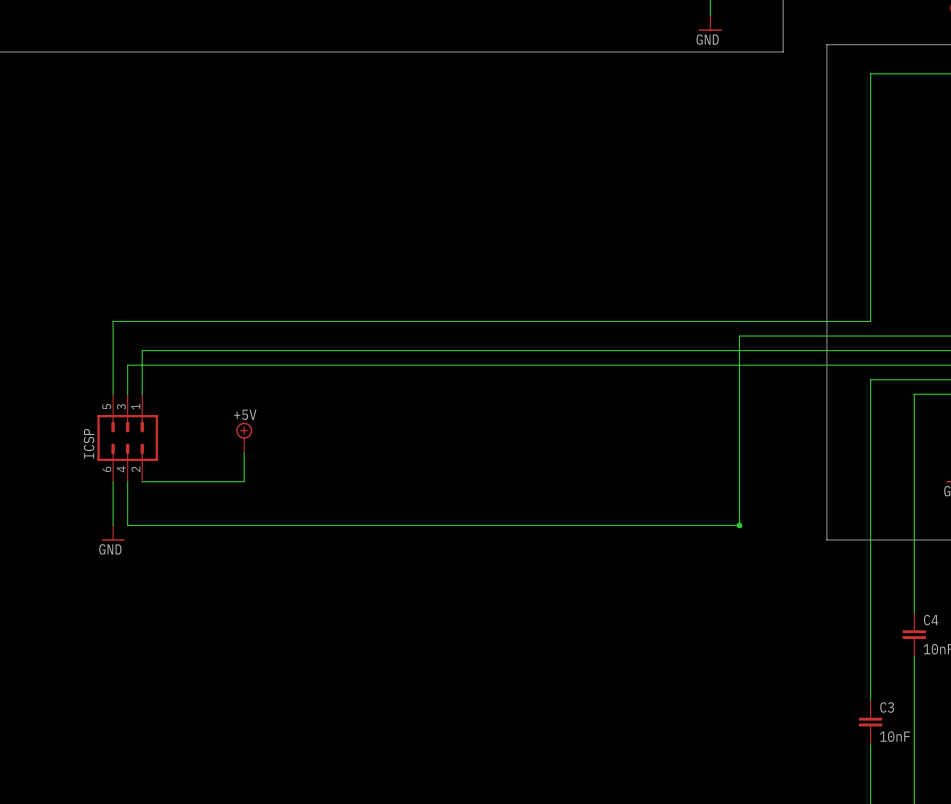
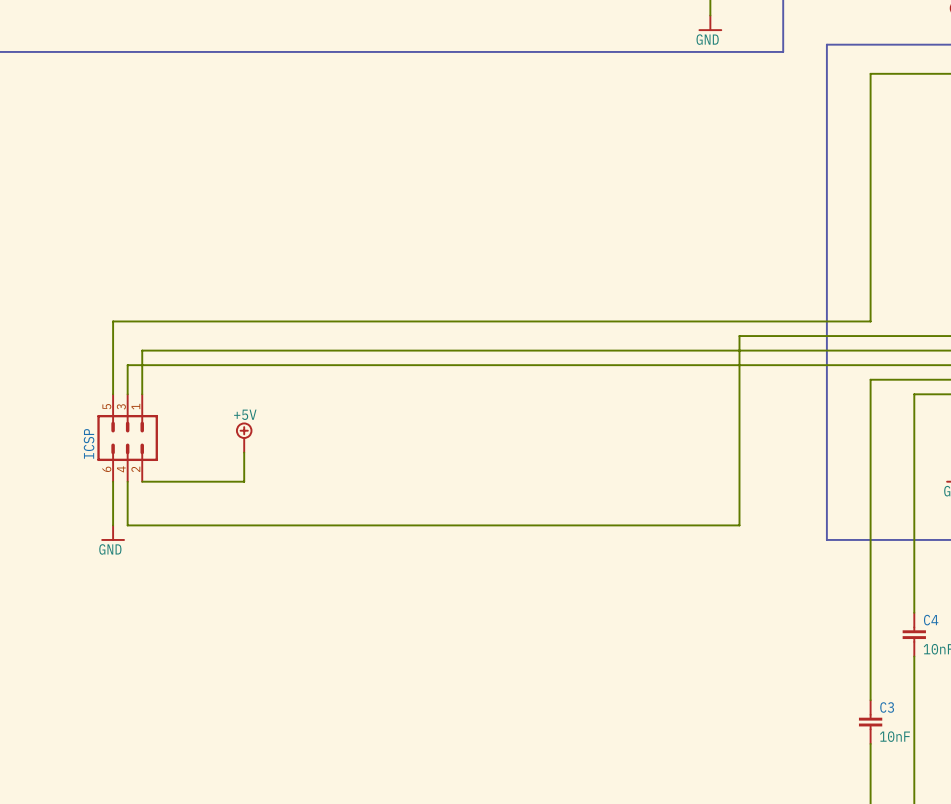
junction: (739, 525) -> none

